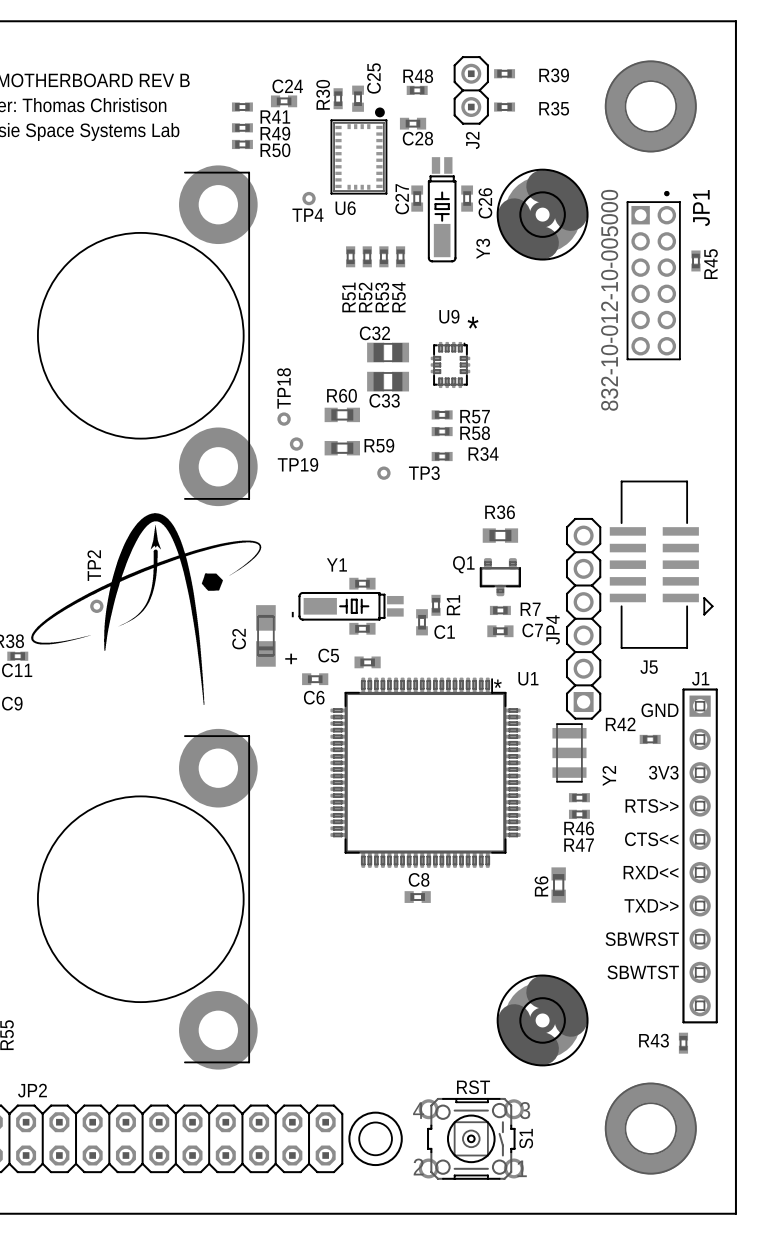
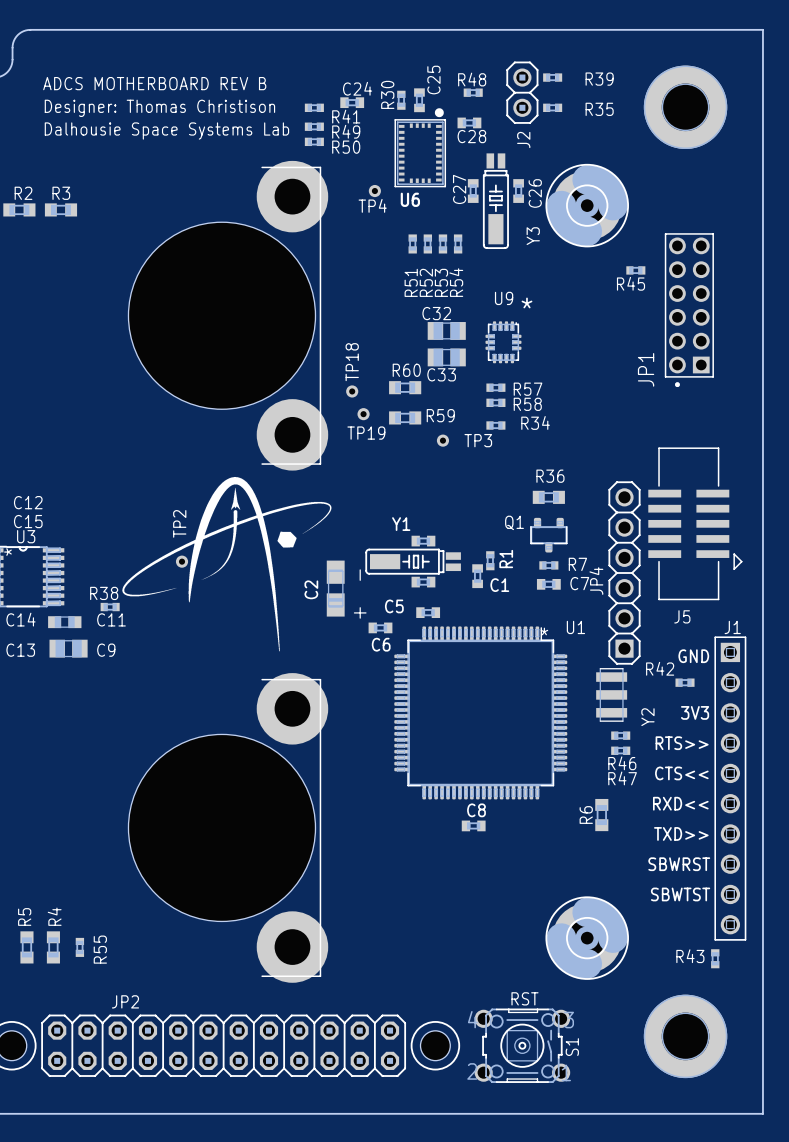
R45 rotation: 0° (695, 260) -> 90° clockwise (635, 270)
R45 position: (695, 260) -> (635, 270)
JP1 rotation: 0° (653, 275) -> 180° (689, 310)
JP1 value: 832-10-012-10-005000 (609, 300) -> none

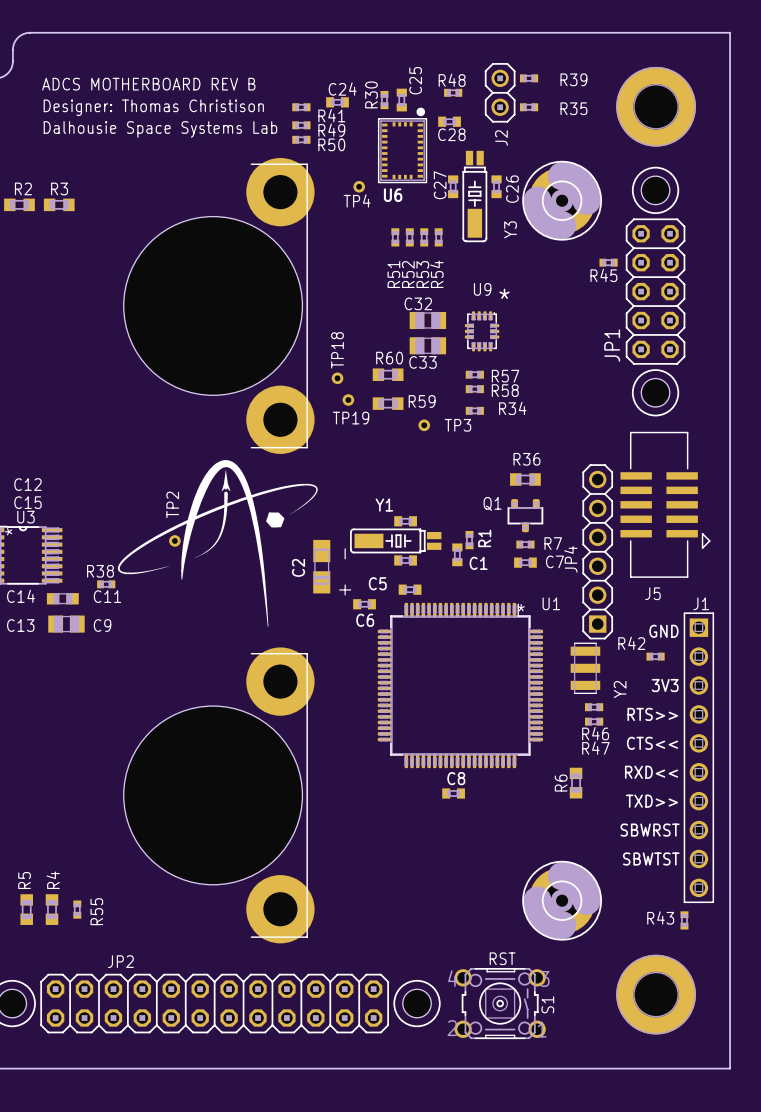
drawing: none -> [631, 166, 680, 215]
hole: none -> (655, 190)
JP1 footprint: [664, 233, 714, 388] -> [625, 218, 686, 365]
drawing: none -> [631, 369, 680, 417]
hole: none -> (655, 392)

